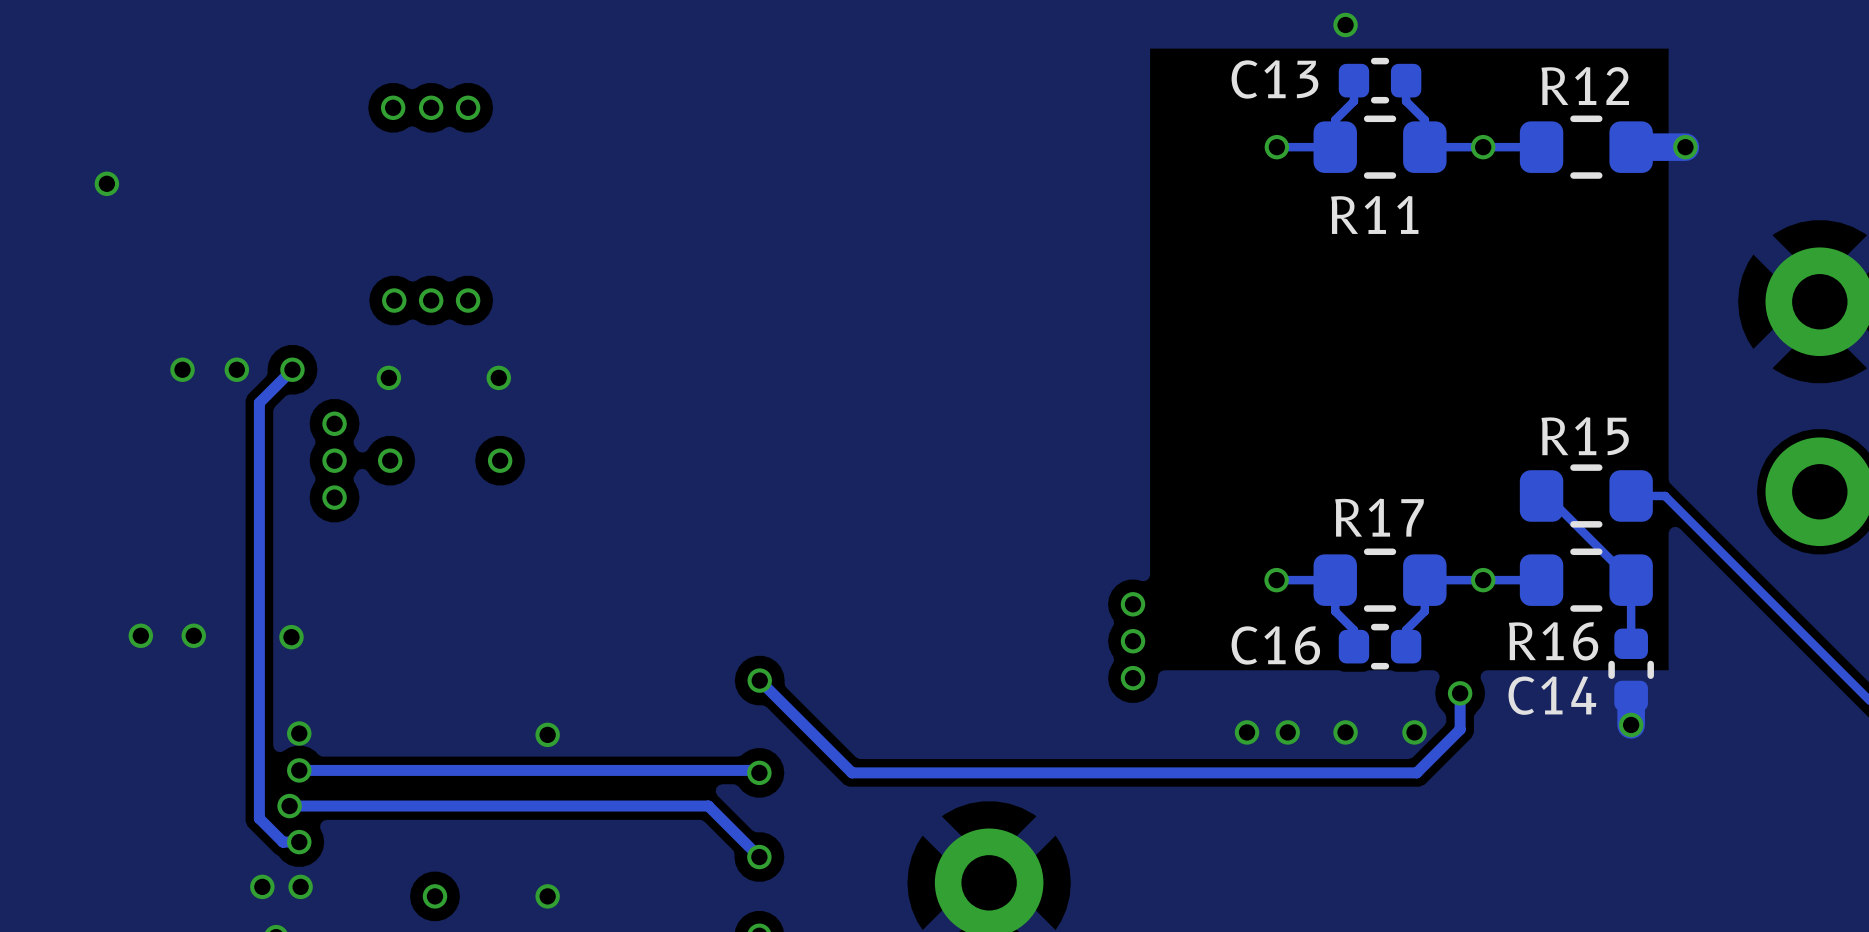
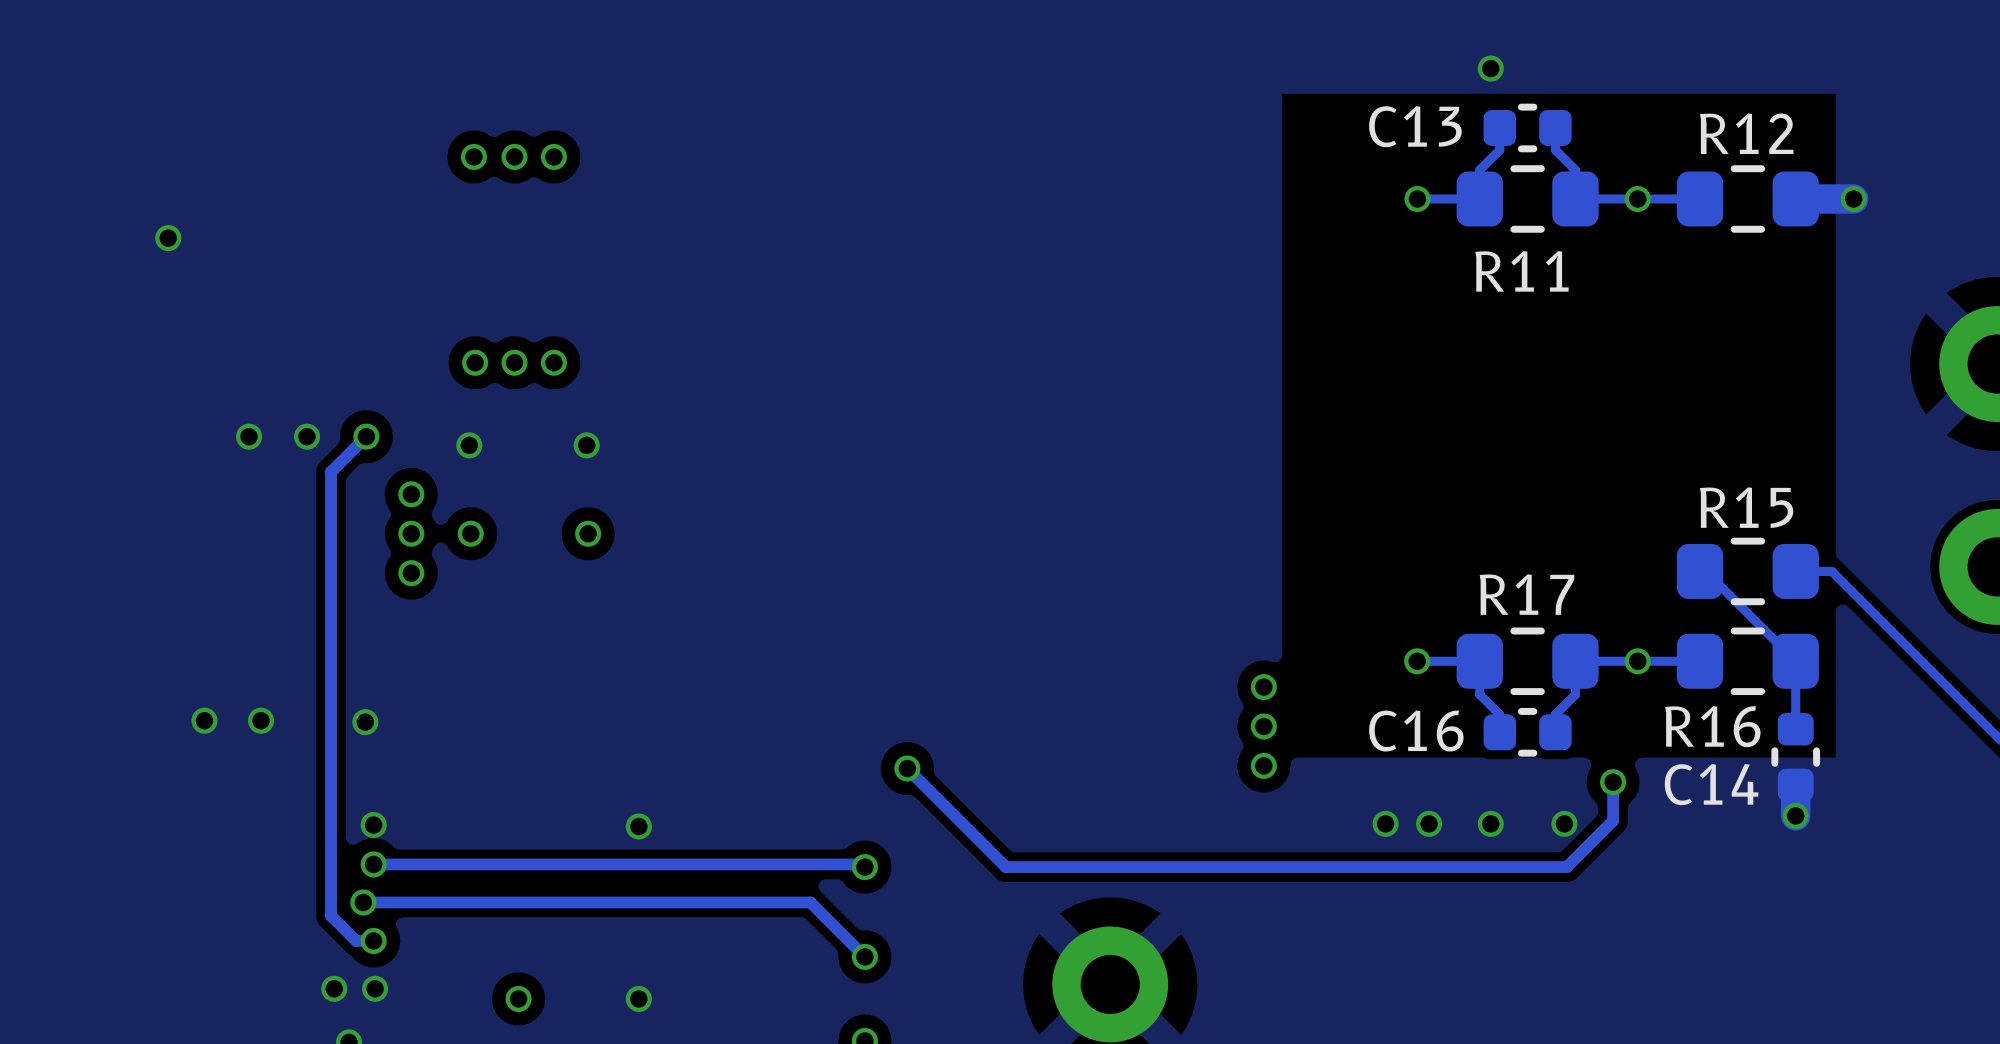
track: (759, 680) (852, 772) (891, 772) -> (907, 768) (1005, 867)
via position: (759, 680) -> (907, 768)

